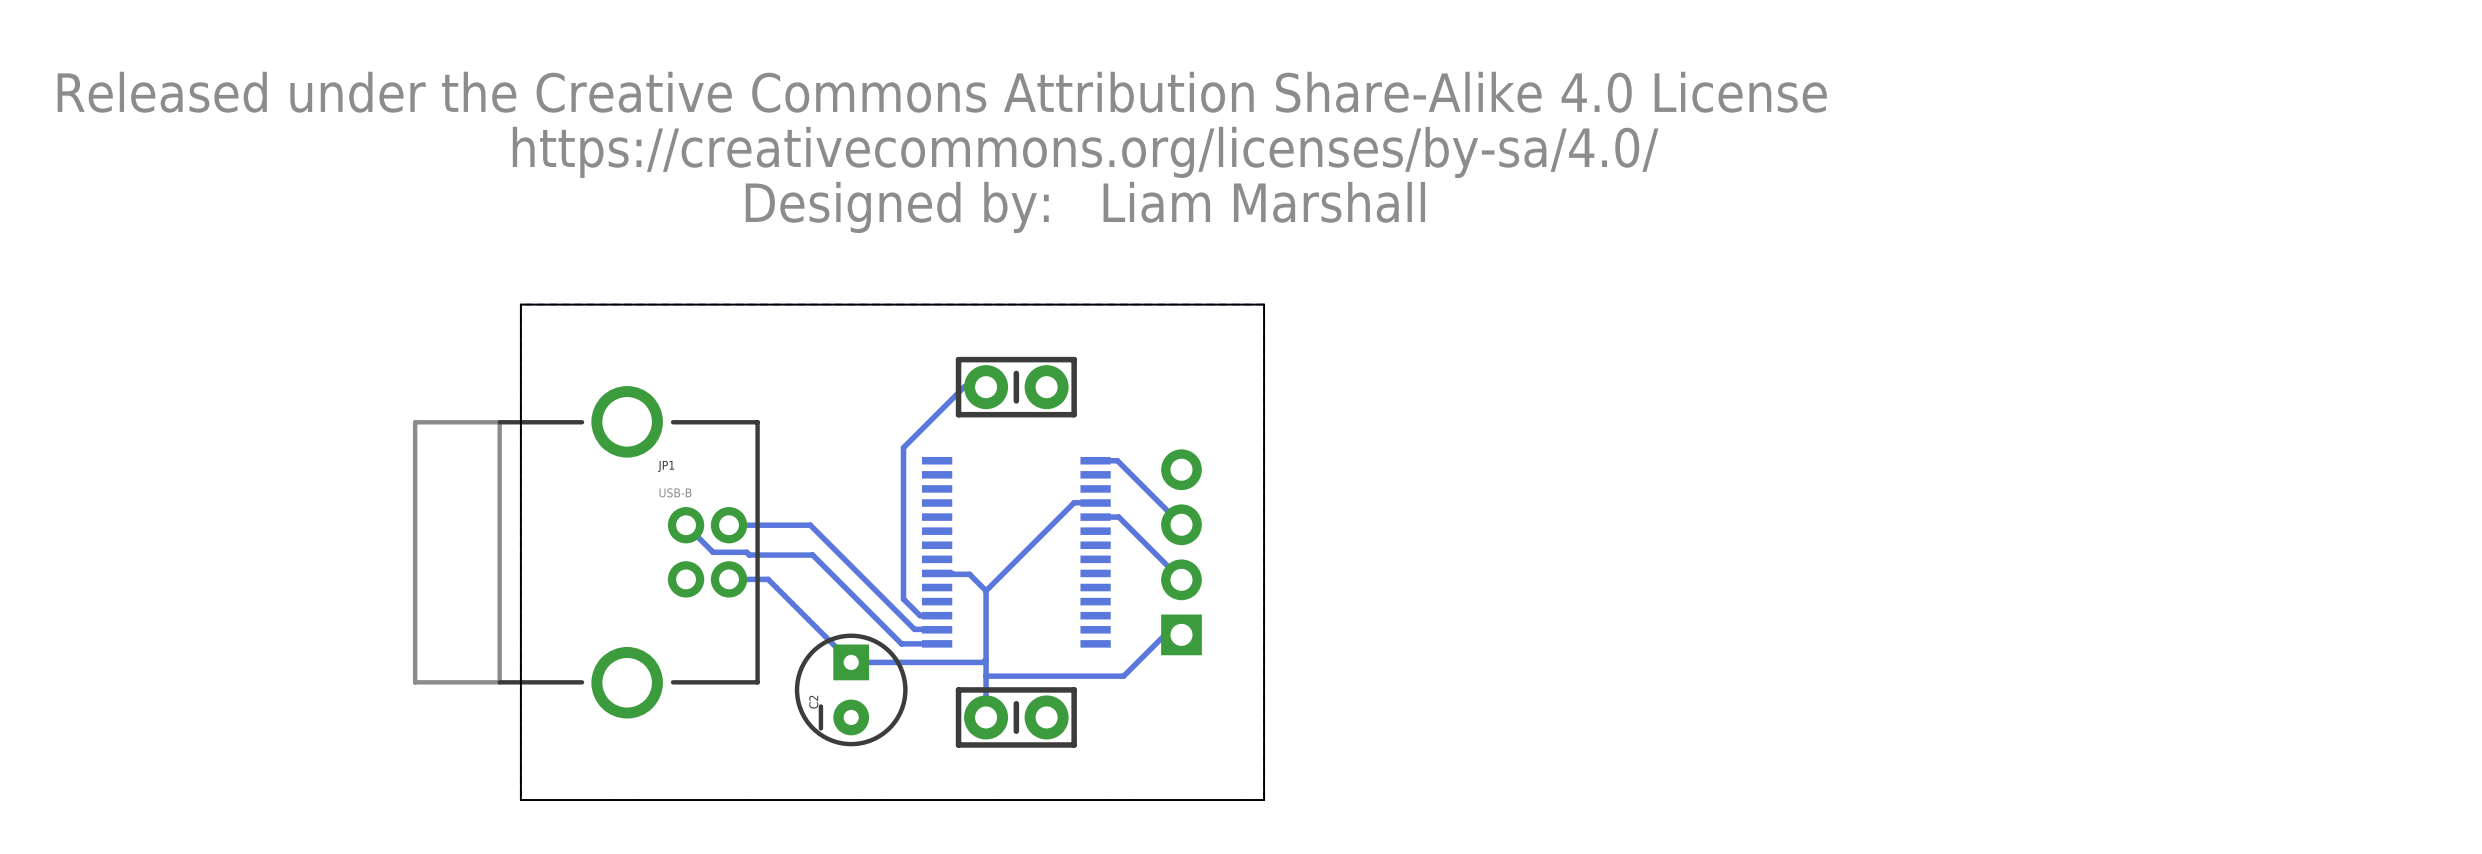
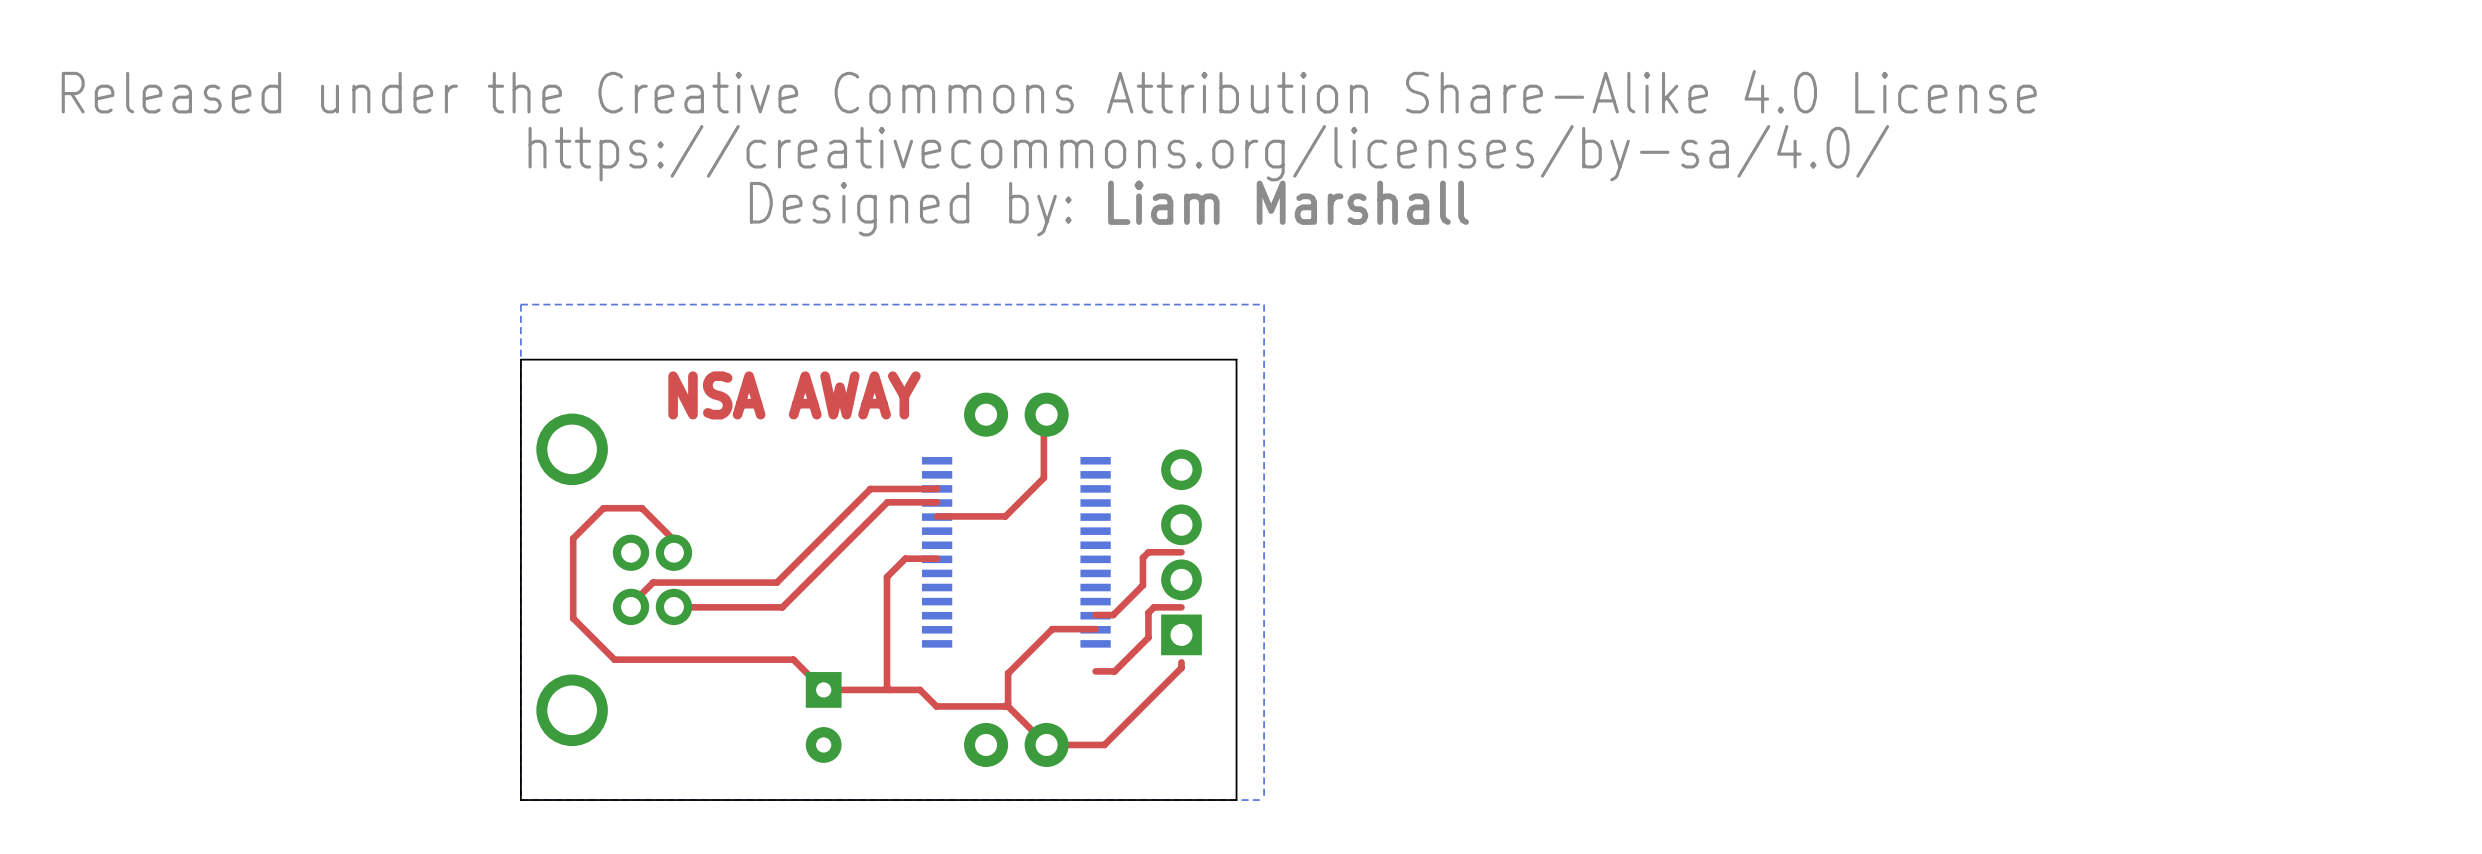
board edge: (520, 359) (520, 304) (1264, 304) (1264, 800) (1236, 800) -> (520, 359) (1236, 359) (1236, 800)
bottom track: (986, 387) (964, 387) (903, 447) (903, 599) (920, 615) (937, 615) -> none
part side: top (1016, 387) -> bottom (1016, 414)
text: none -> NSA AWAY (794, 395)
top track: none -> (1046, 414) (1043, 417) (1043, 477) (1005, 516) (937, 516)
bottom track: (1095, 460) (1117, 460) (1181, 524) -> none
top track: none -> (937, 488) (870, 489) (776, 582) (653, 582) (631, 604) (631, 606)
top track: none -> (937, 502) (887, 502) (782, 607) (673, 606)
bottom track: (1095, 502) (1074, 502) (986, 590) -> none
bottom track: (1095, 517) (1118, 517) (1181, 579) -> none
bottom track: (686, 525) (713, 552) (746, 552) (749, 555) (812, 555) (901, 643) (937, 643) -> none
bottom track: (728, 525) (810, 525) (914, 629) (937, 629) -> none
JP1 side: top (586, 552) -> bottom (614, 579)
top track: none -> (673, 552) (673, 540) (642, 508) (603, 508) (573, 538) (573, 618) (614, 659) (793, 659) (823, 689) (920, 689) (936, 706) (1008, 706) (1046, 744) (1104, 744) (1181, 667) (1181, 662)
top track: none -> (1181, 552) (1148, 552) (1142, 557) (1142, 585) (1113, 615) (1095, 615)
top track: none -> (937, 558) (905, 558) (886, 577) (886, 687) (889, 689)
bottom track: (937, 573) (969, 574) (986, 590) -> none
bottom track: (728, 579) (768, 579) (851, 662) (983, 662) (986, 659) -> none
bottom track: (986, 590) (986, 717) -> none
top track: none -> (1181, 607) (1153, 607) (1148, 612) (1148, 637) (1114, 671) (1095, 671)
top track: none -> (1095, 629) (1052, 629) (1008, 673) (1008, 703) (1005, 706)
bottom track: (1181, 634) (1164, 634) (1123, 676) (986, 676) -> none
C2 side: top (851, 689) -> bottom (823, 717)
part side: top (1016, 717) -> bottom (1016, 744)

